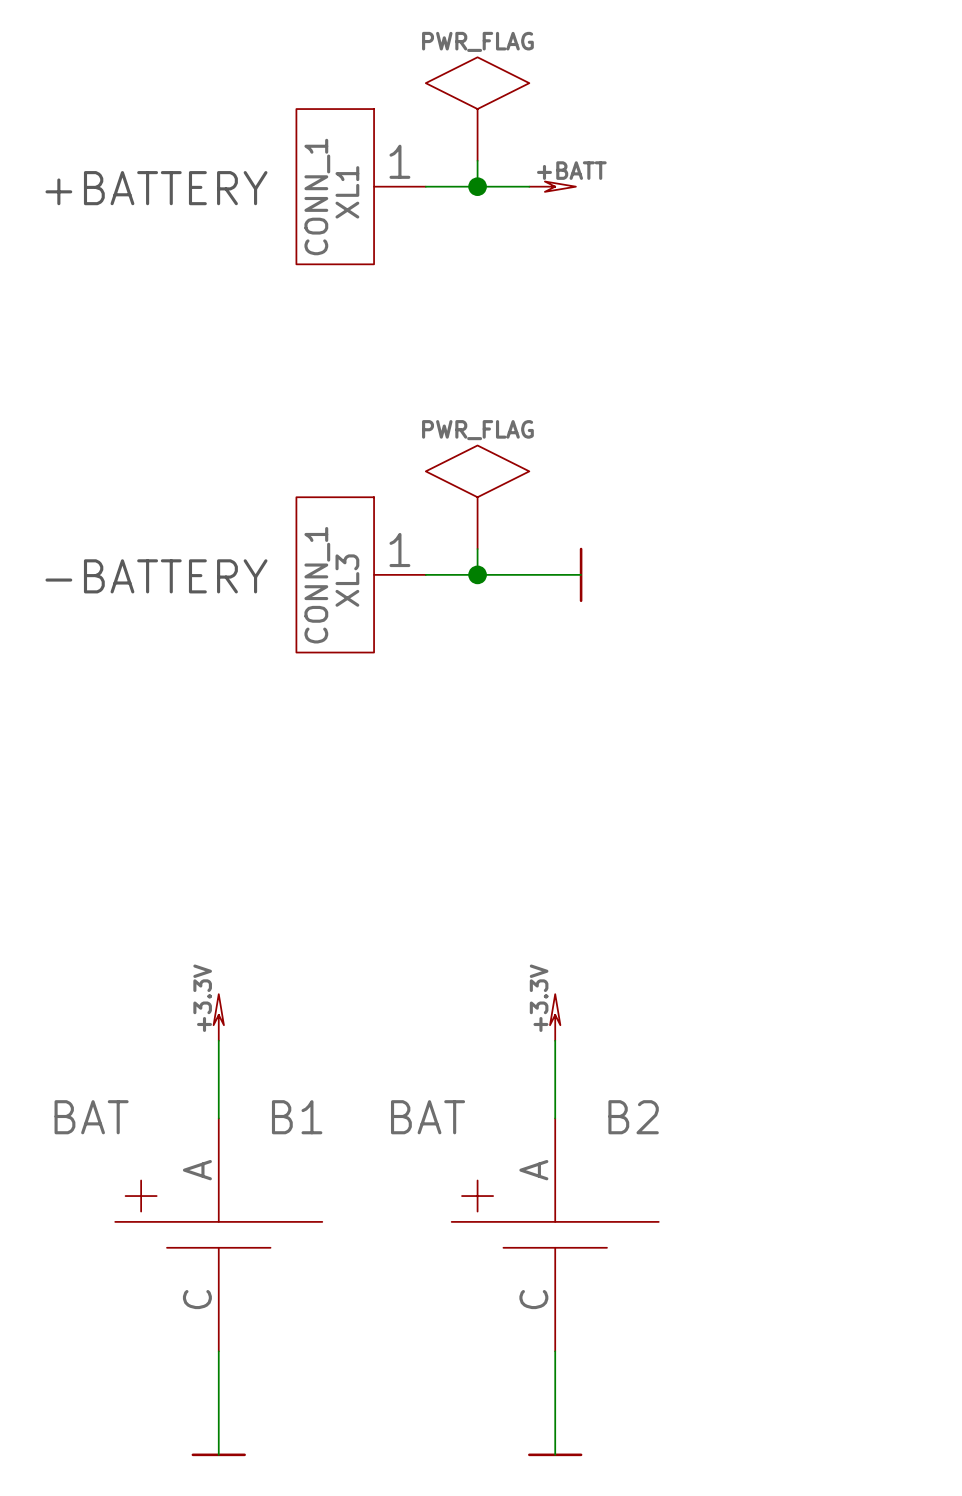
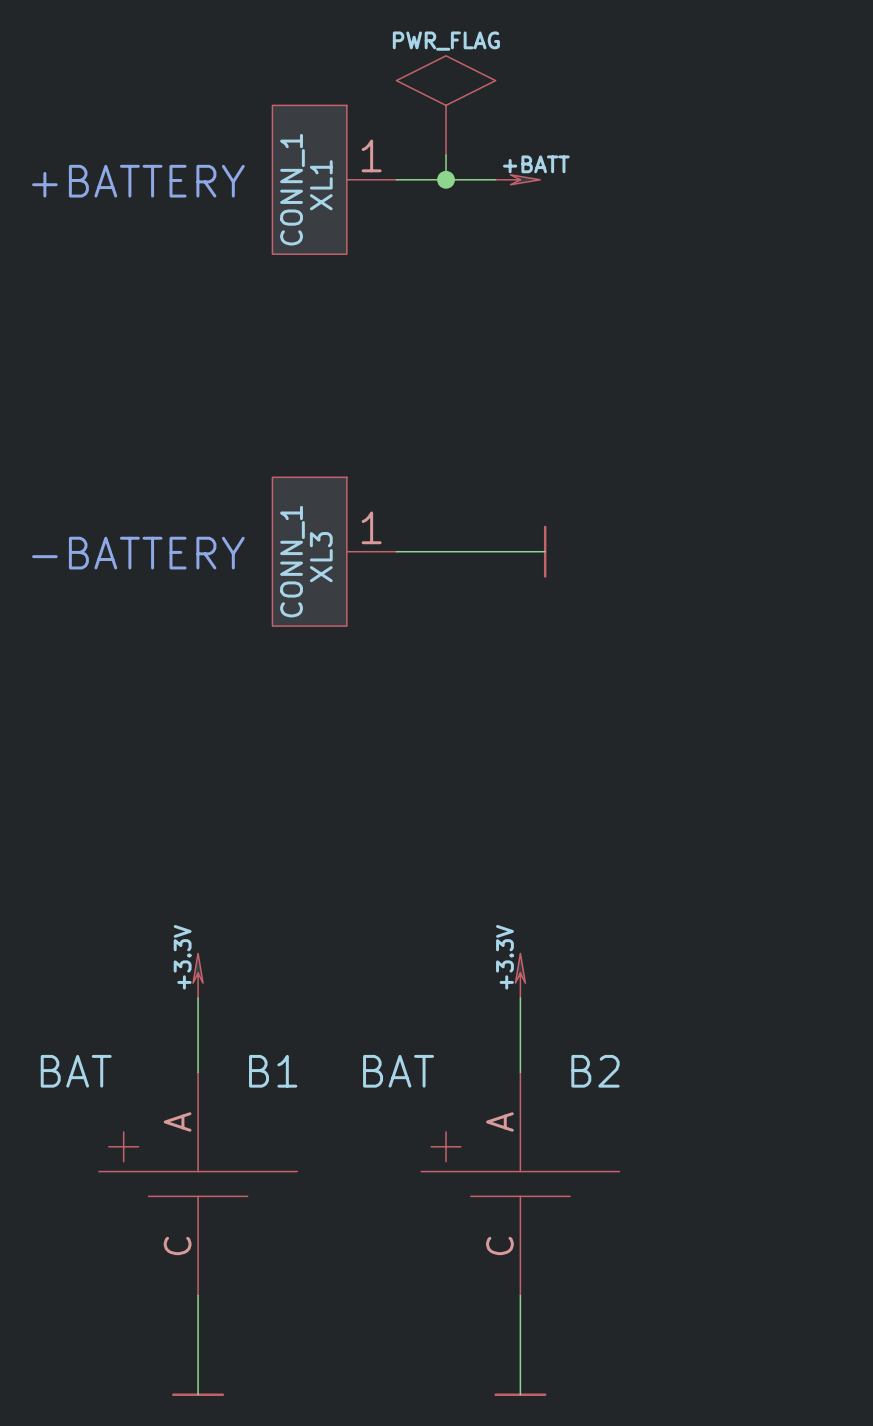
power symbol: PWR_FLAG (477, 497) -> none
wire: (477, 549) (477, 574) -> none
junction: (477, 574) -> none

